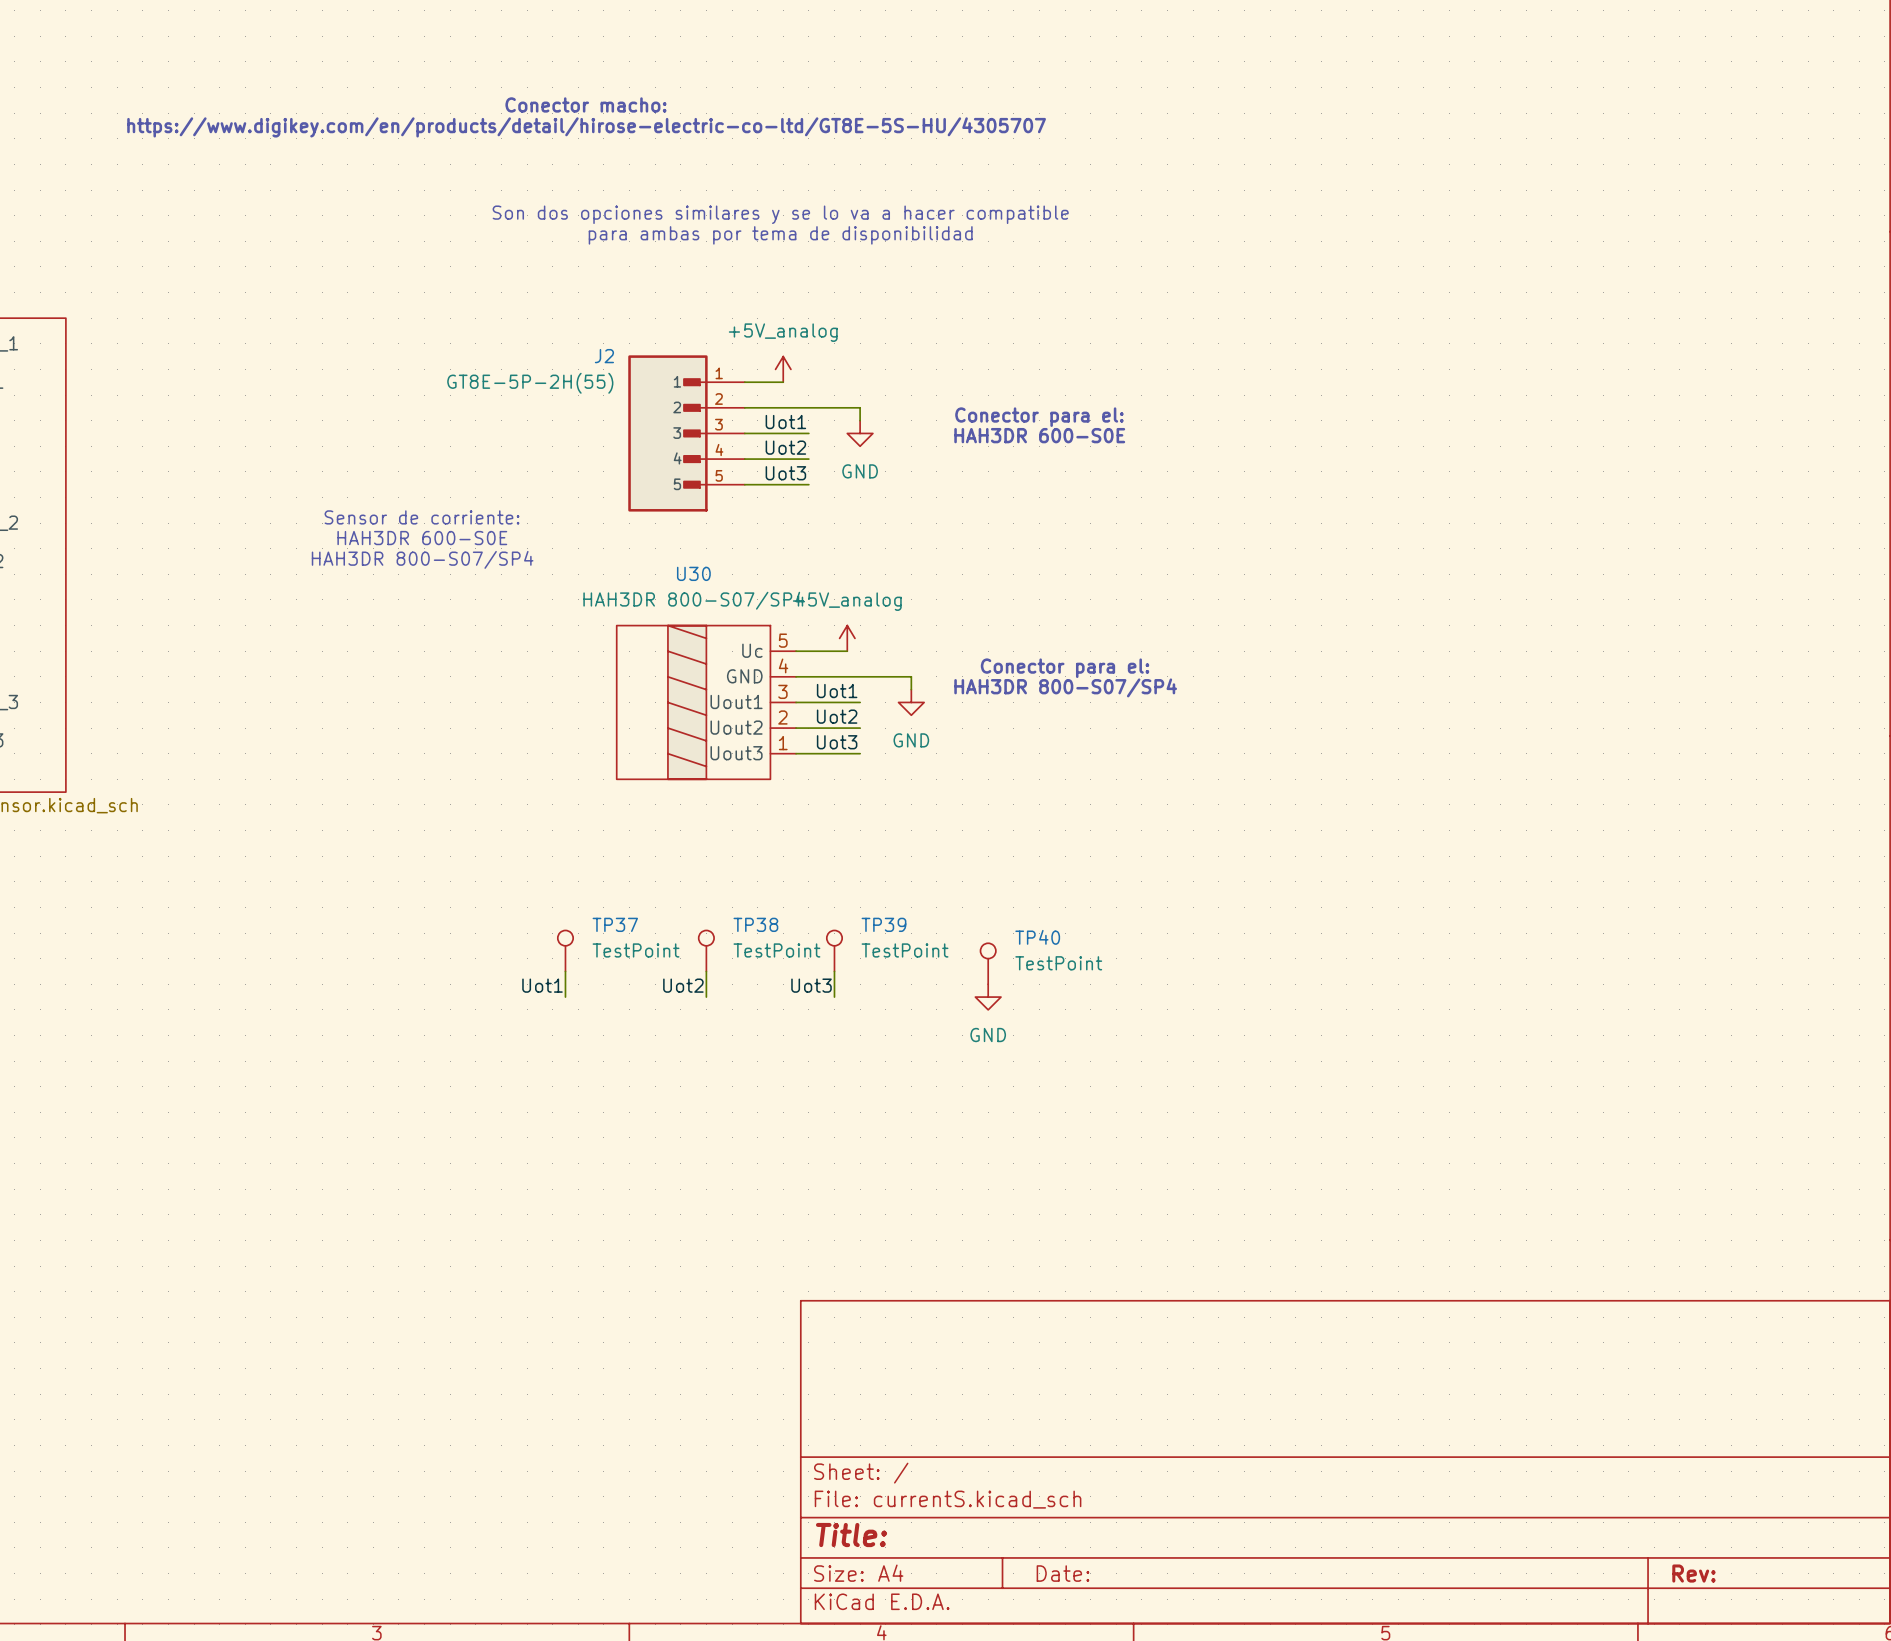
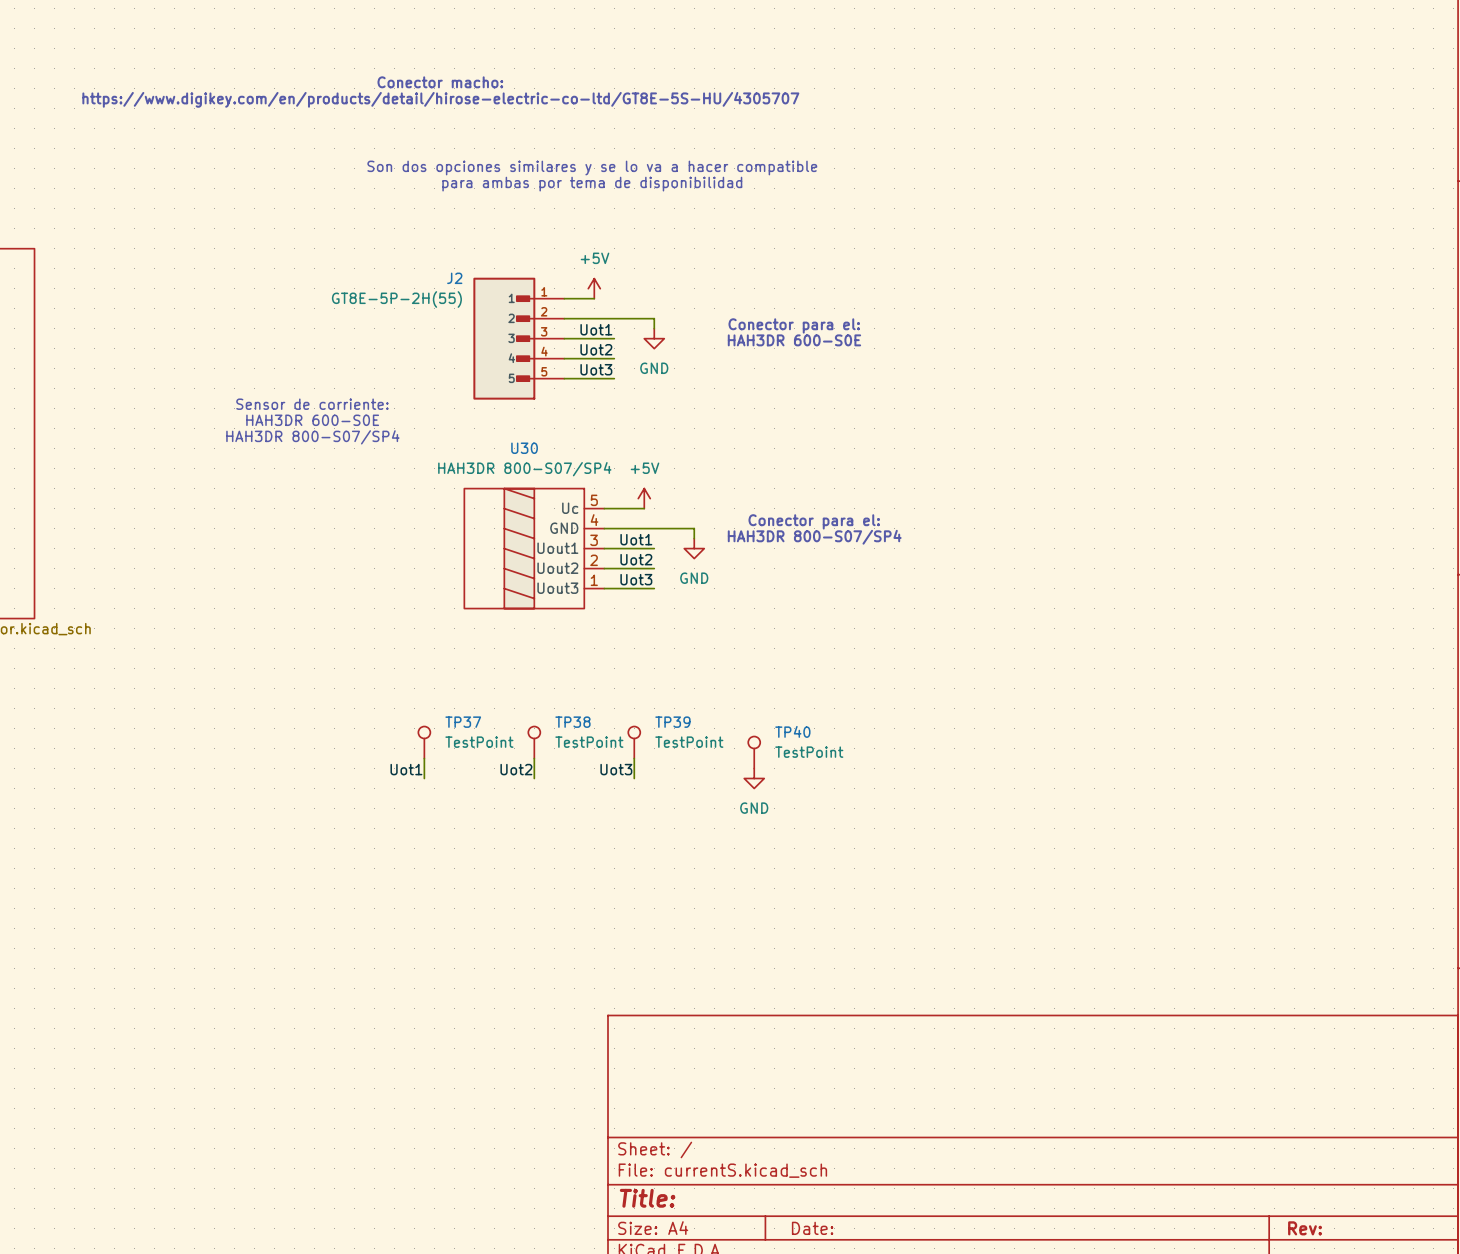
power symbol: +5V_analog (783, 369) -> +5V (594, 288)
power symbol: +5V_analog (847, 638) -> +5V (644, 498)

